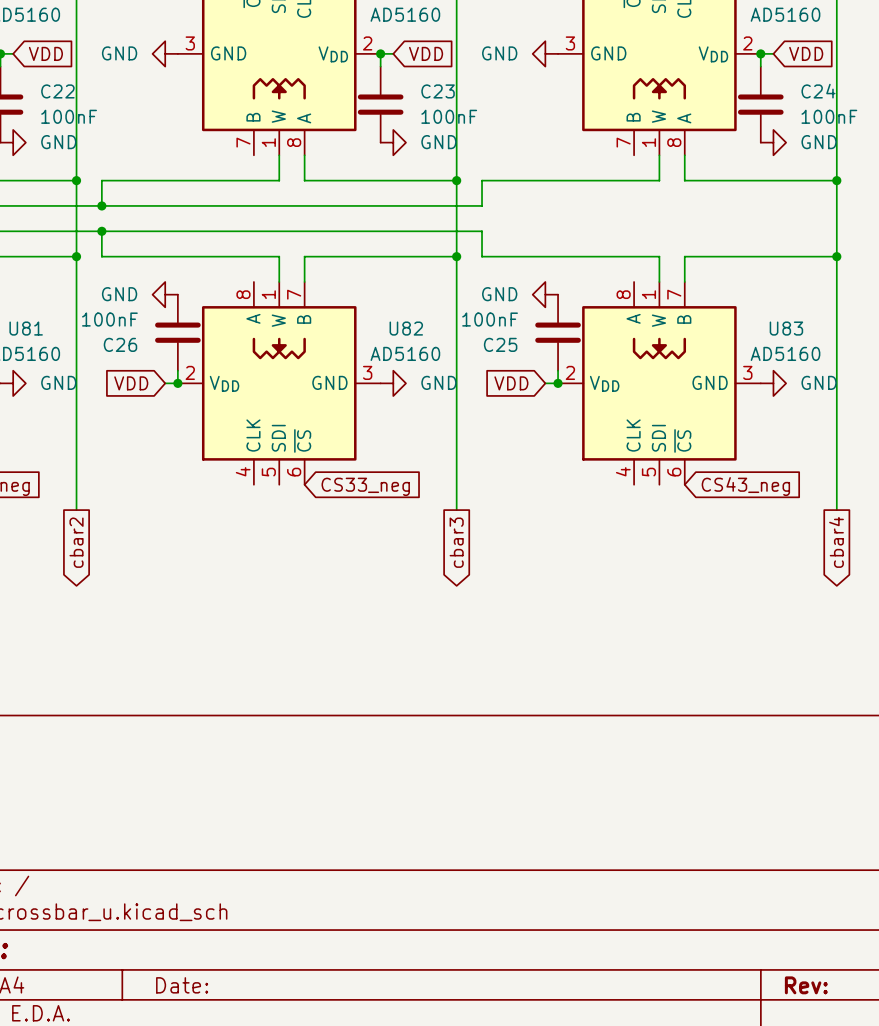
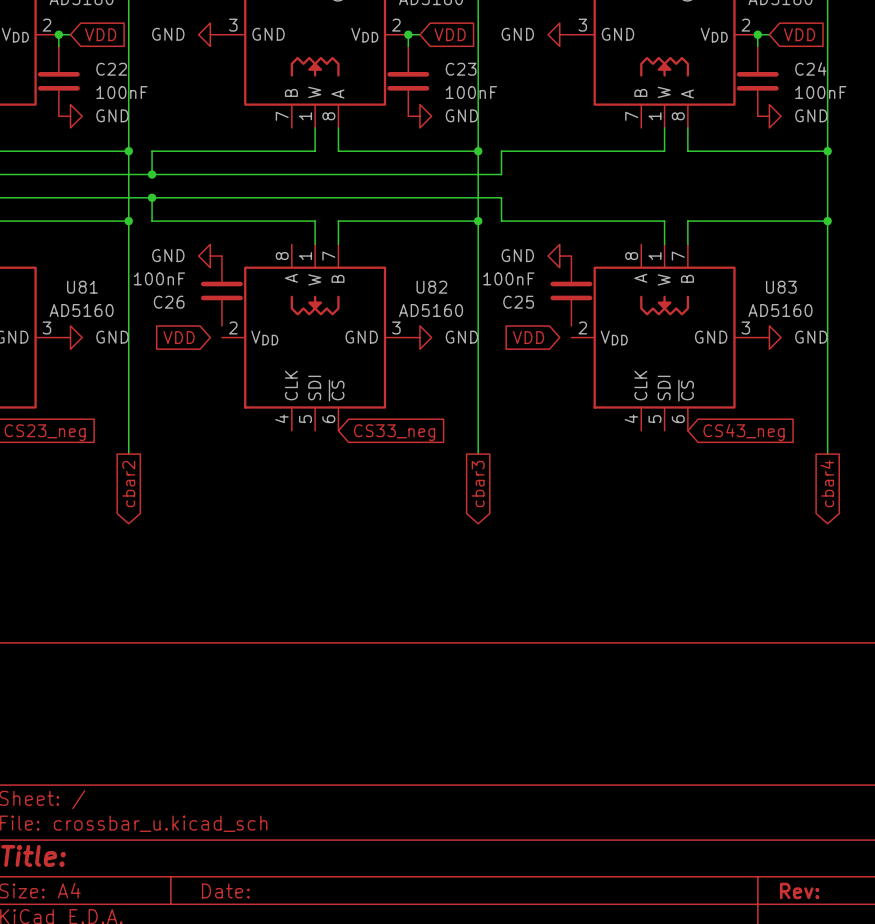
wire: (177, 370) (177, 383) (165, 383) -> none
wire: (558, 370) (558, 383) (545, 383) -> none
junction: (177, 383) -> none
junction: (558, 383) -> none

